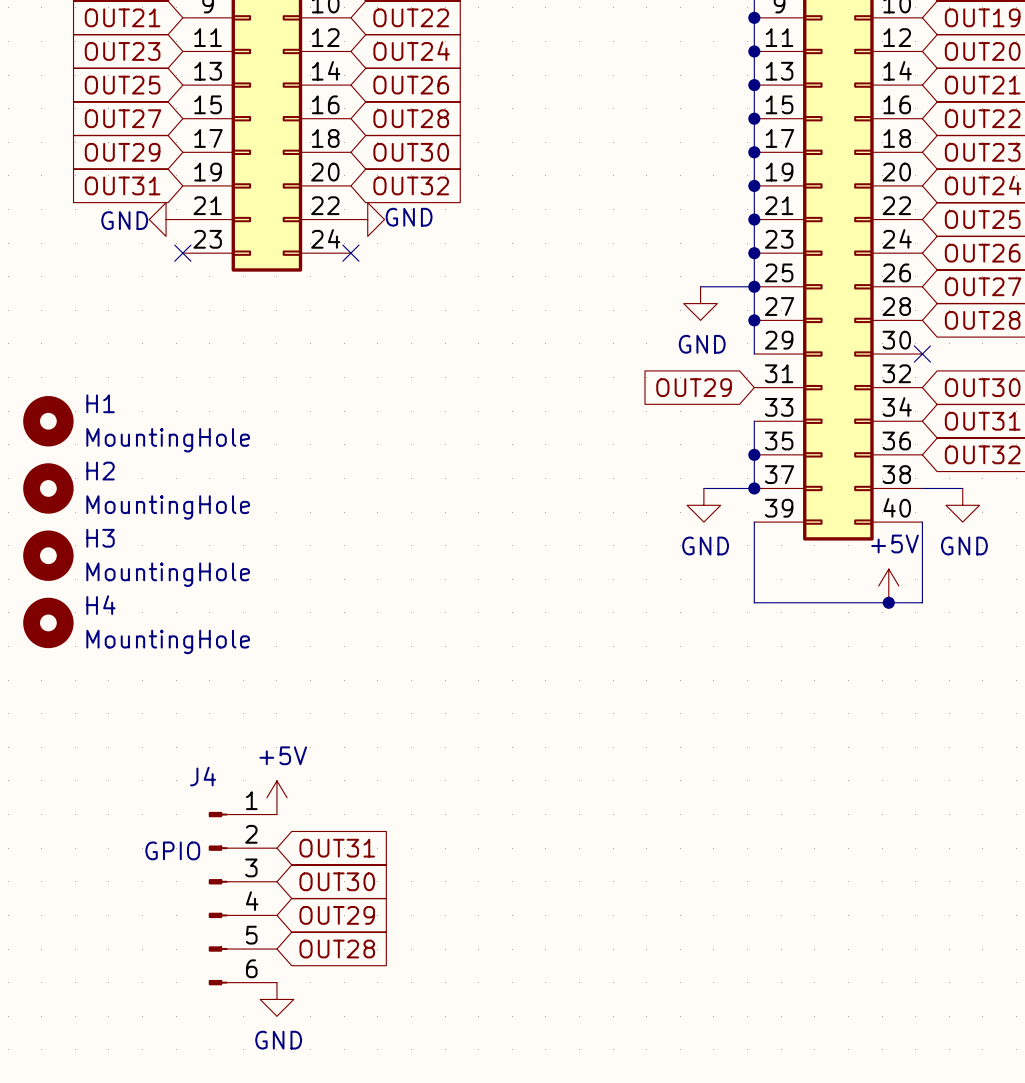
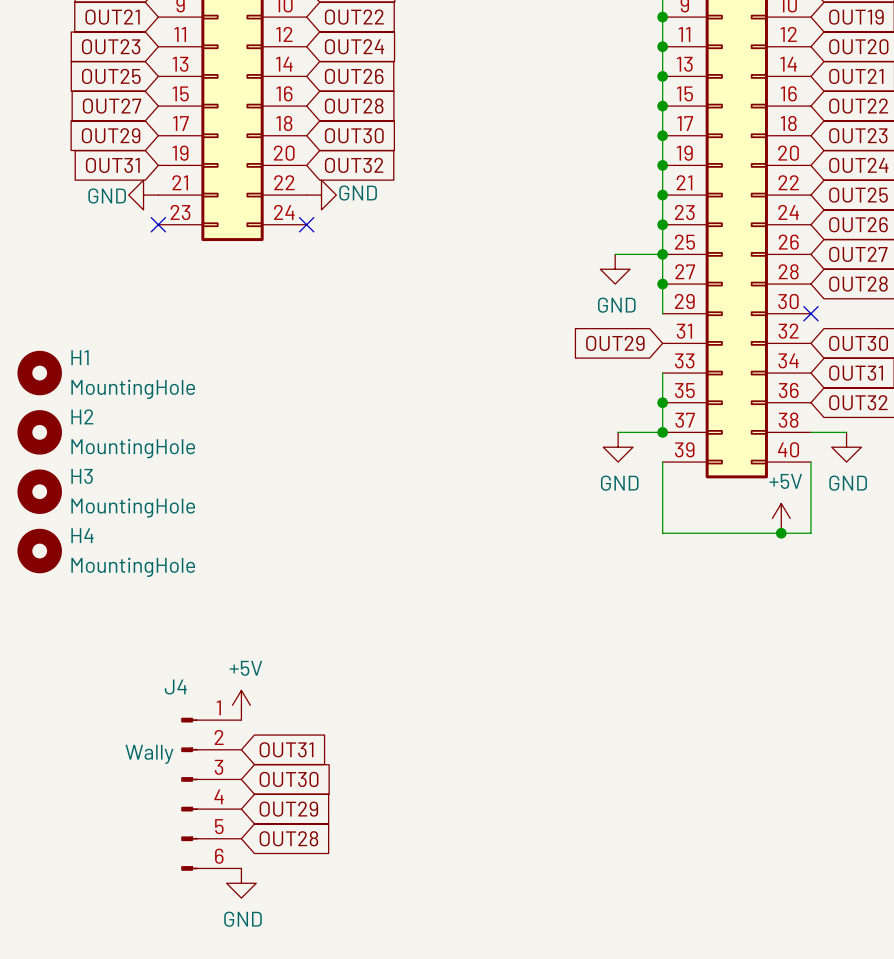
J4 value: GPIO (172, 850) -> Wally (149, 754)

